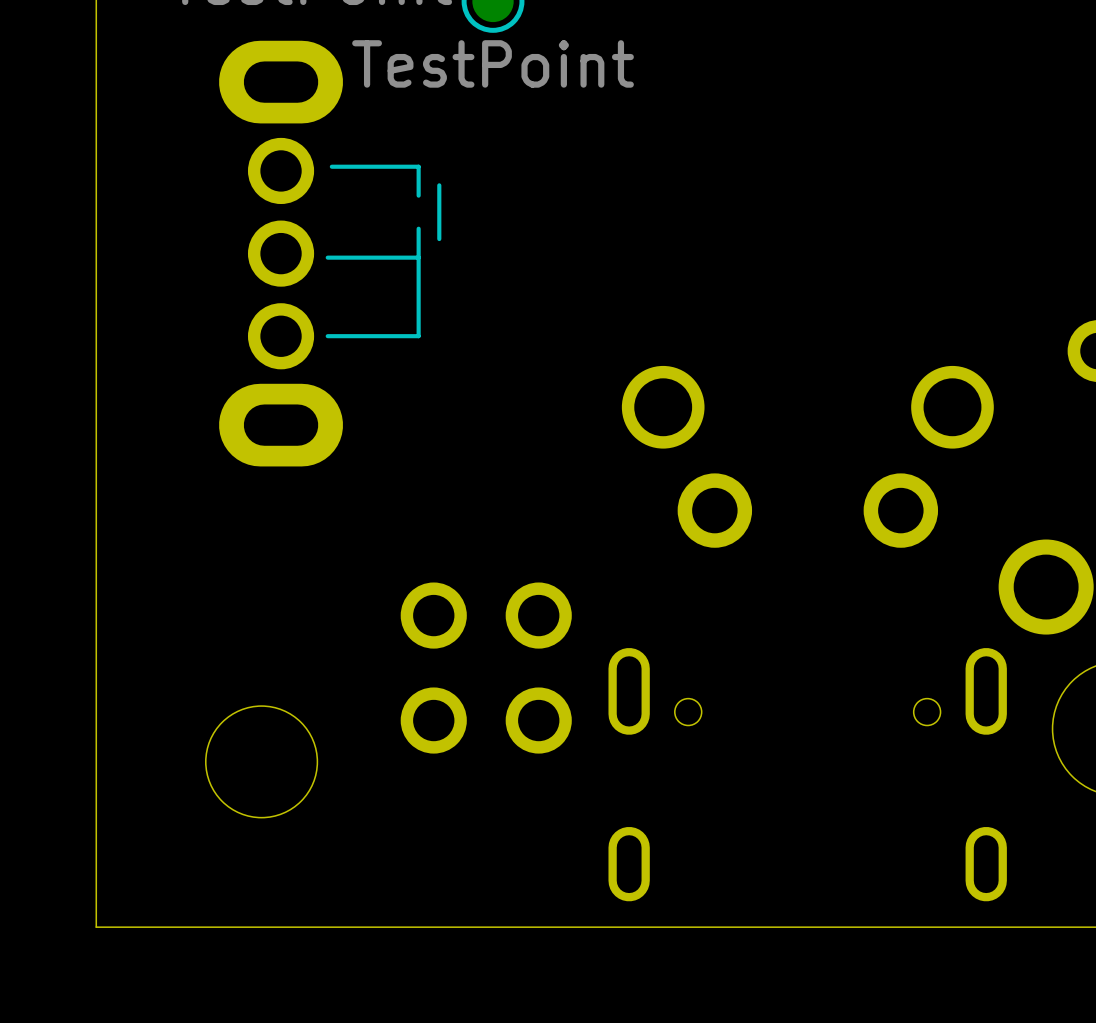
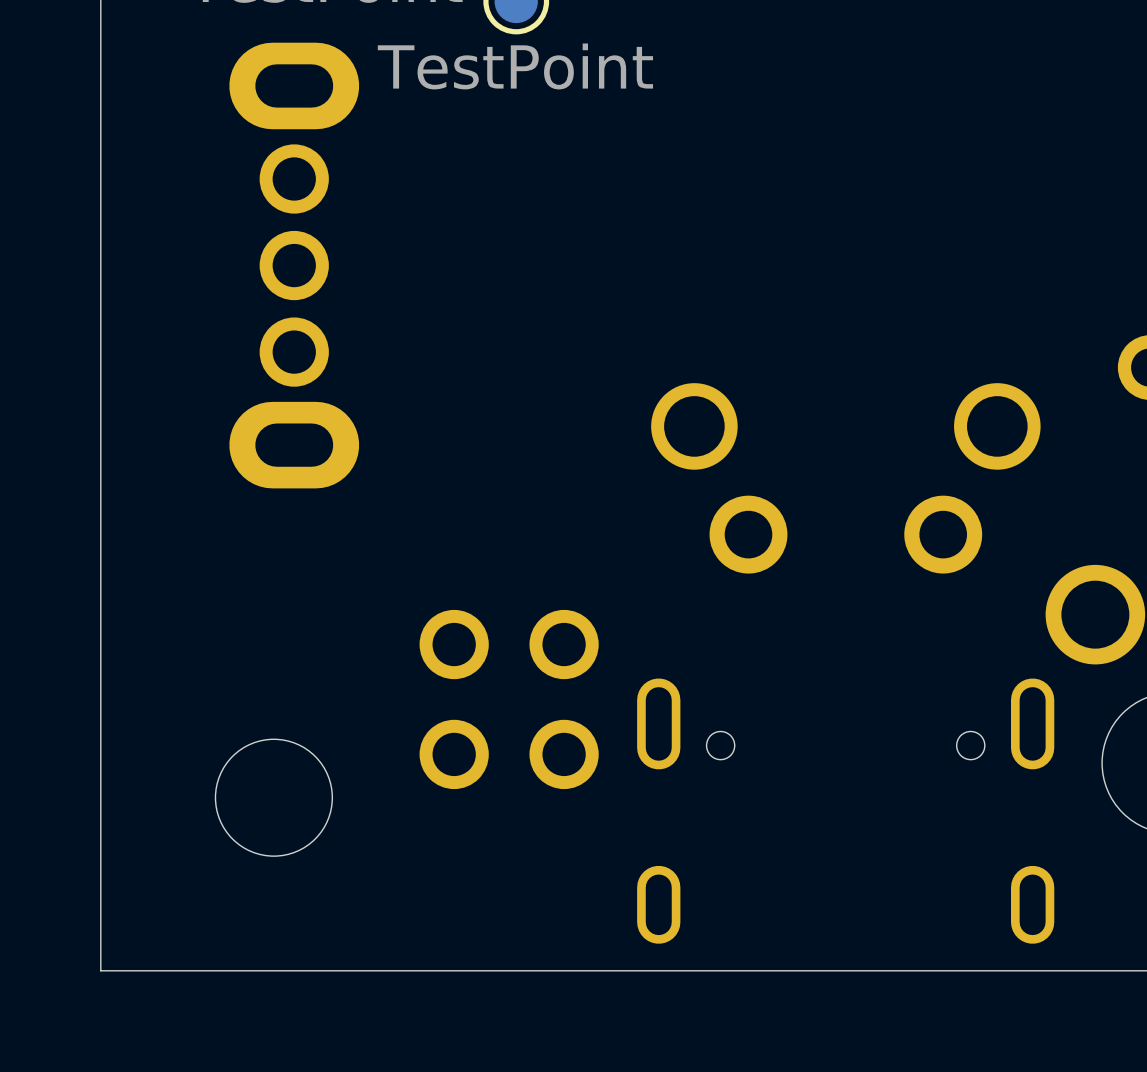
line: (331, 166) (418, 166) (418, 195) -> none
line: (439, 185) (439, 239) -> none
line: (418, 228) (418, 336) (327, 336) -> none
line: (418, 257) (327, 257) -> none

